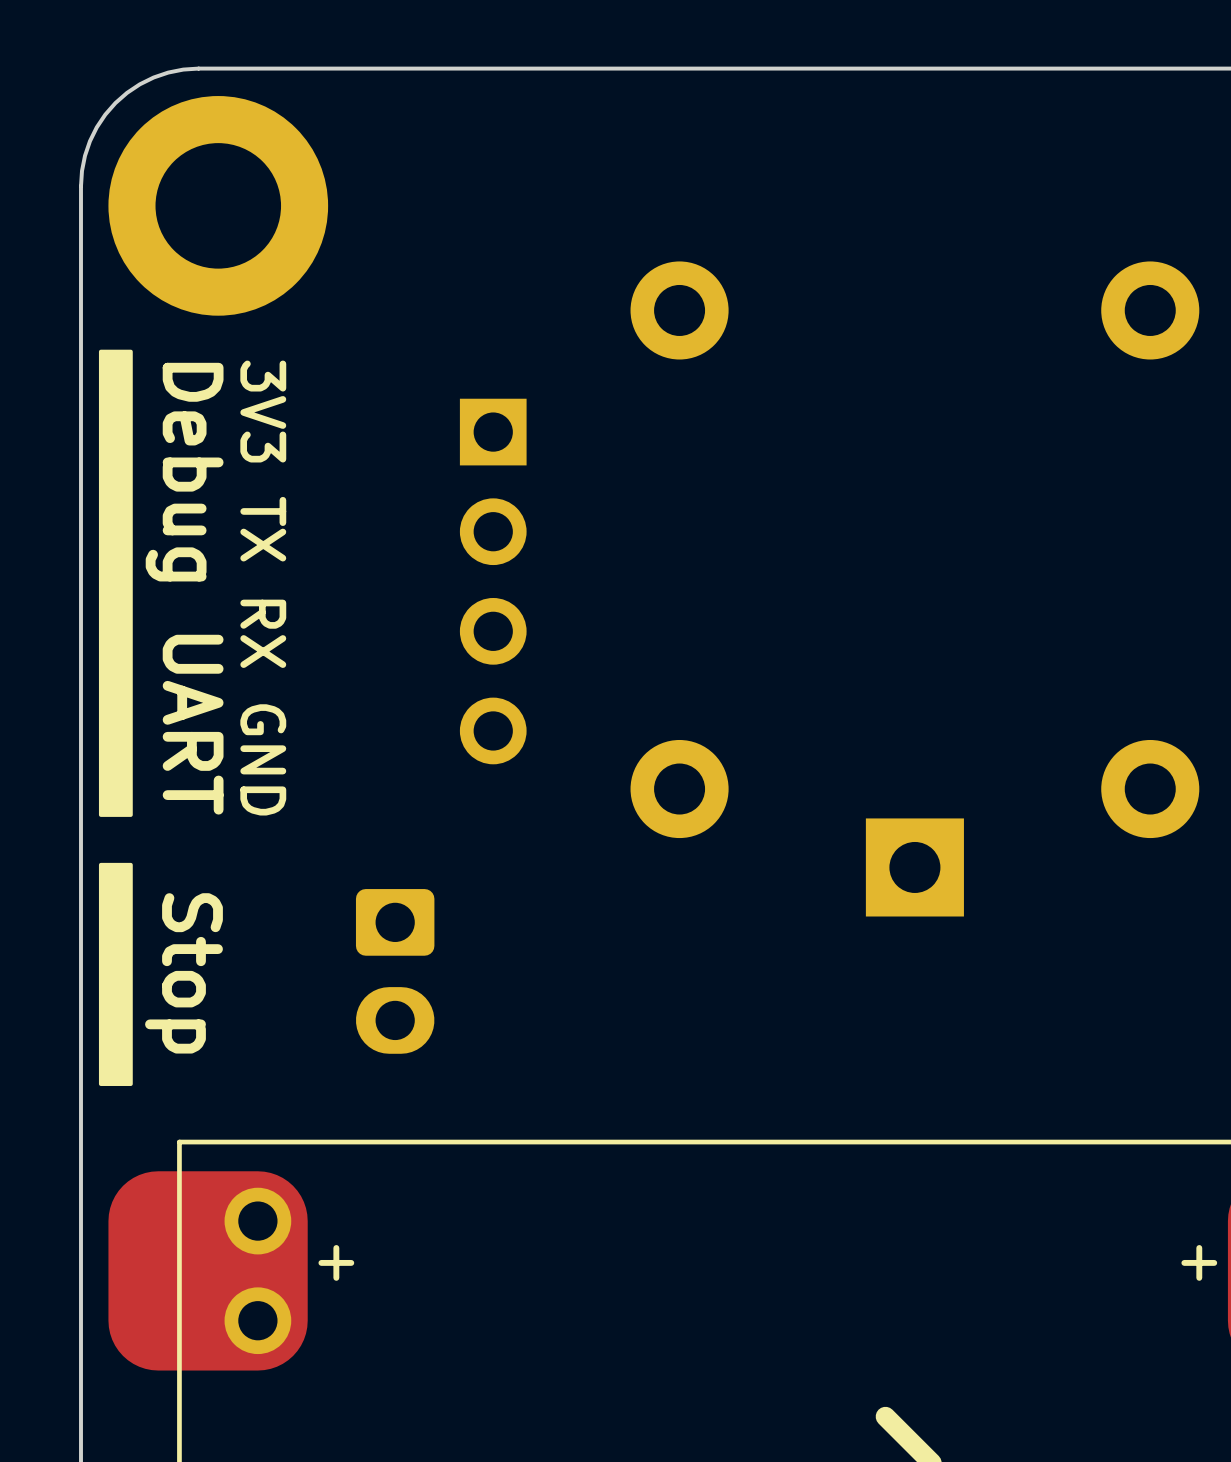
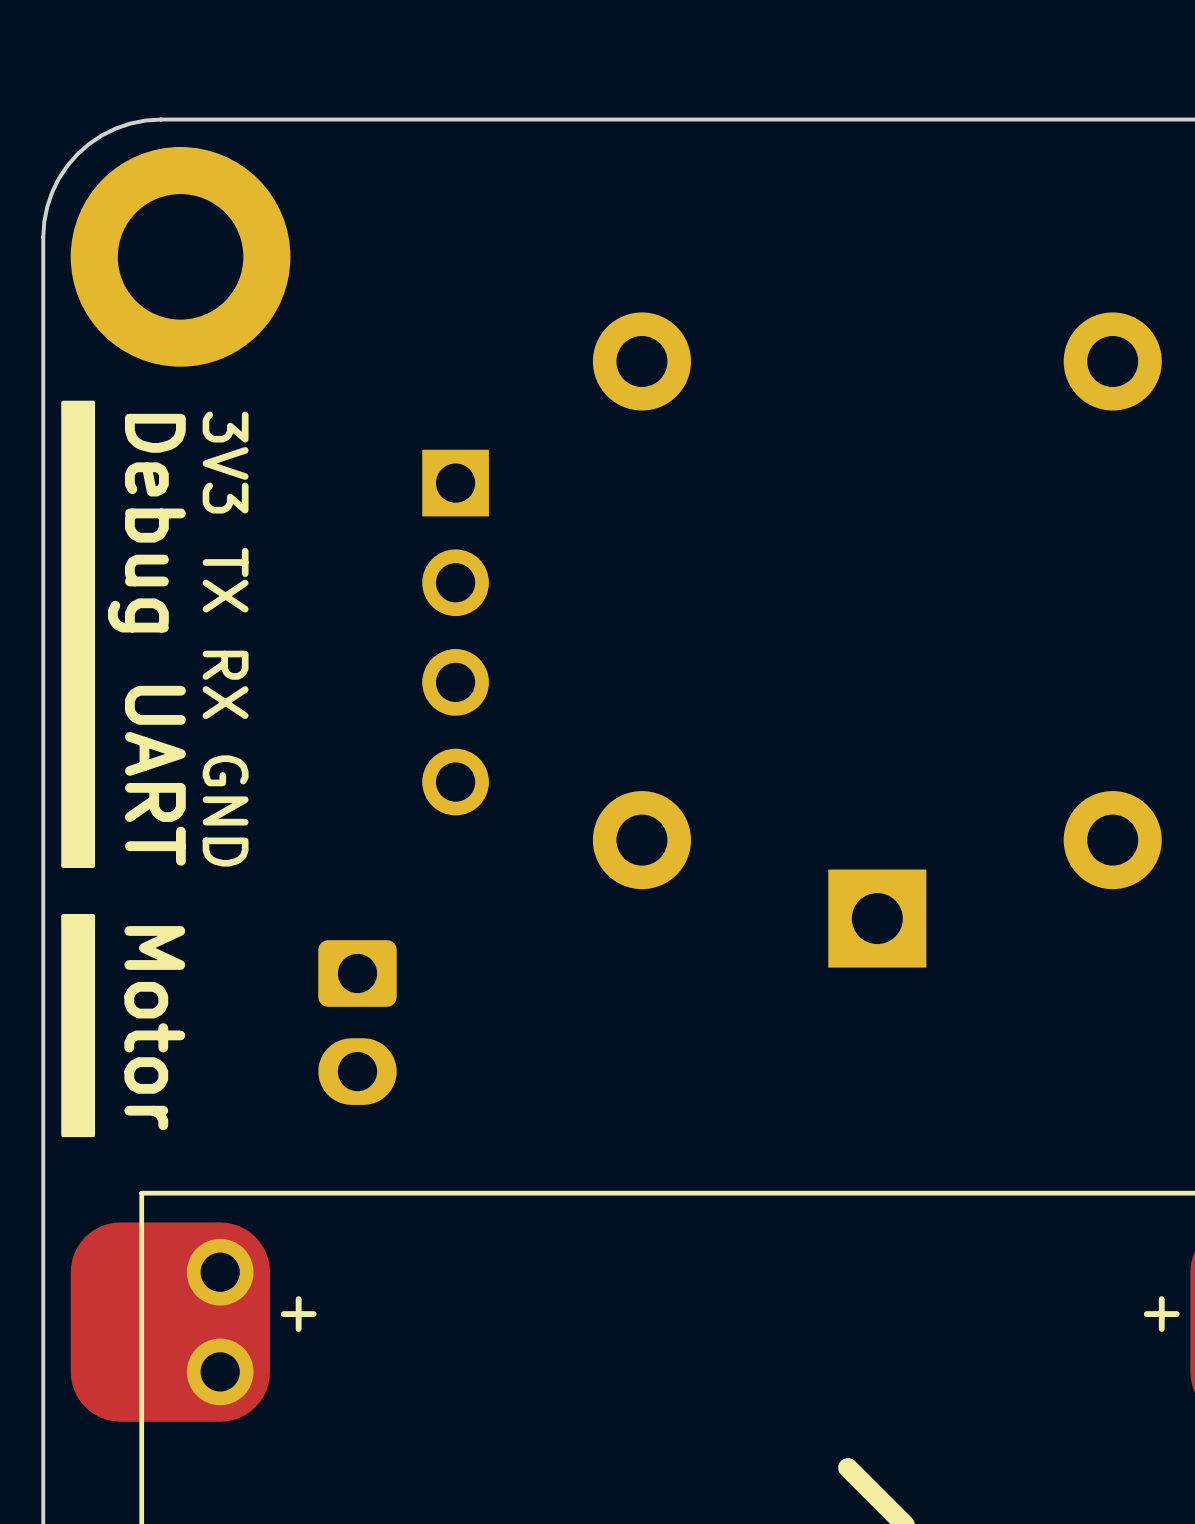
text: Stop (183, 973) -> Motor (154, 1028)

